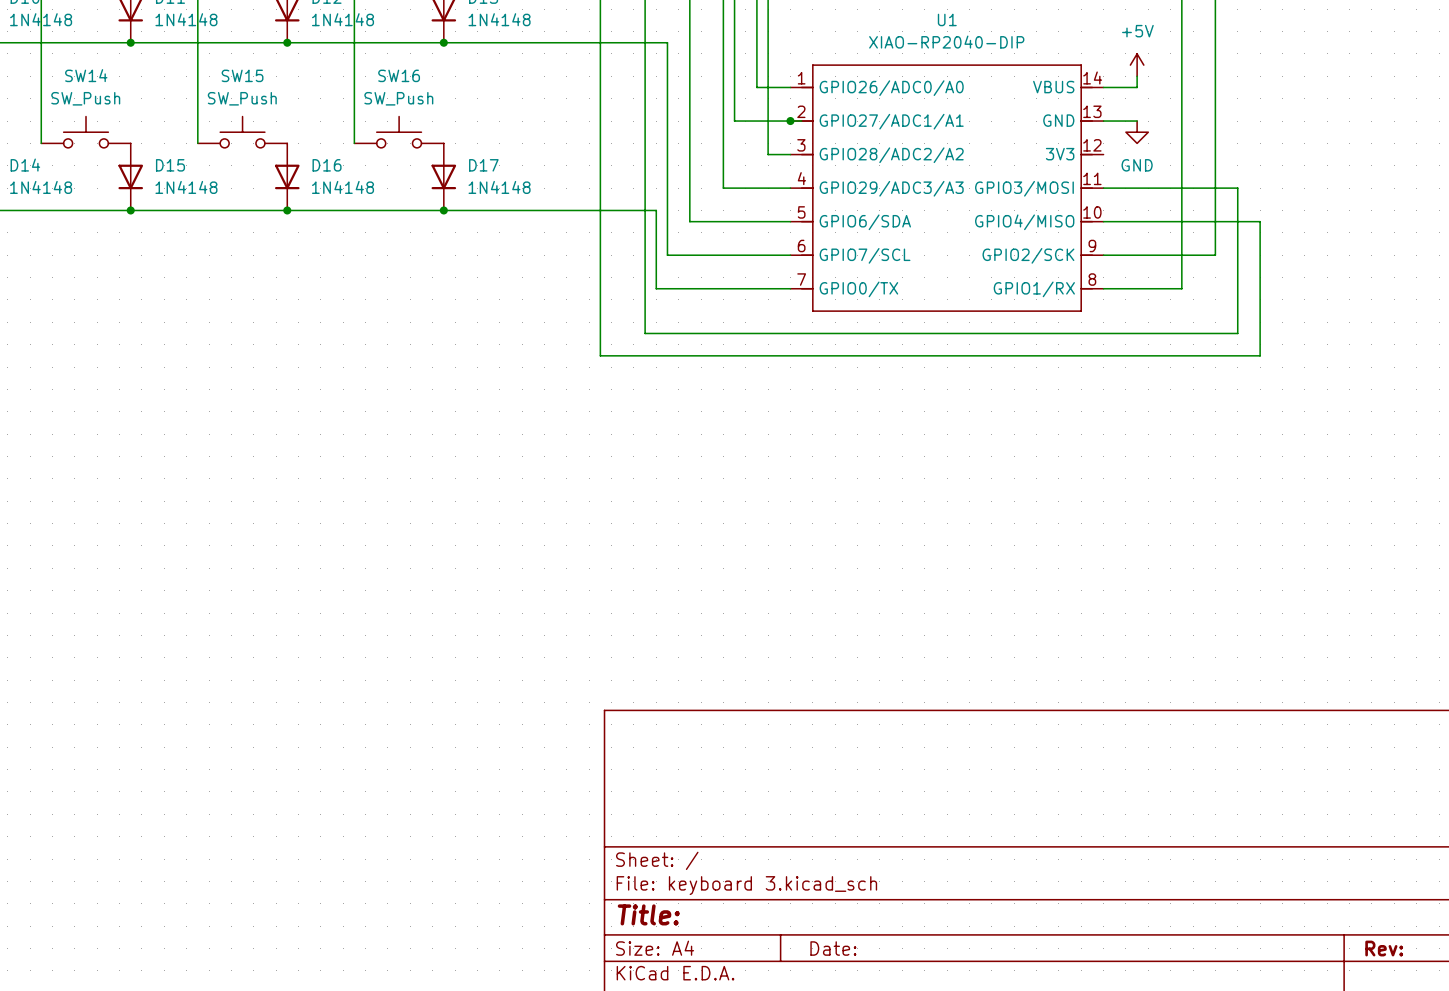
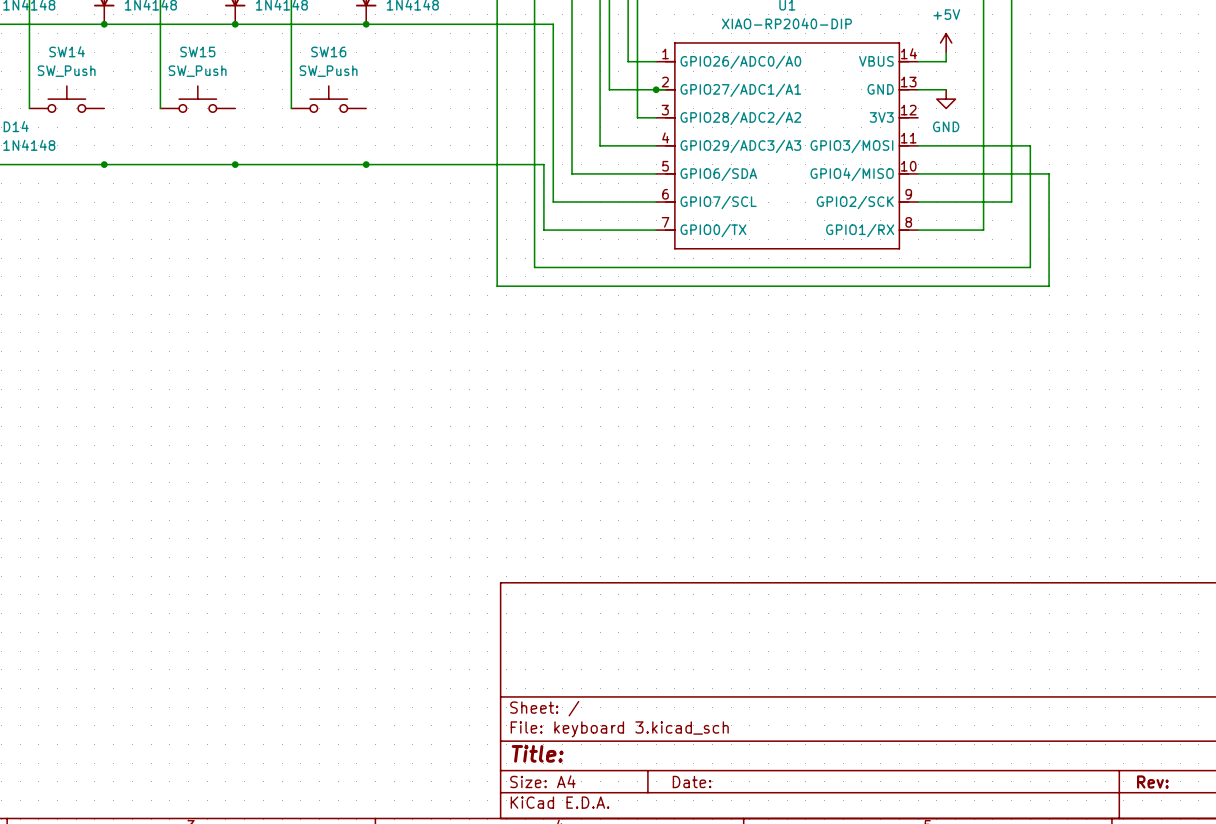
D15: 1N4148 (130, 176) -> none
D16: 1N4148 (287, 176) -> none
D17: 1N4148 (443, 176) -> none

